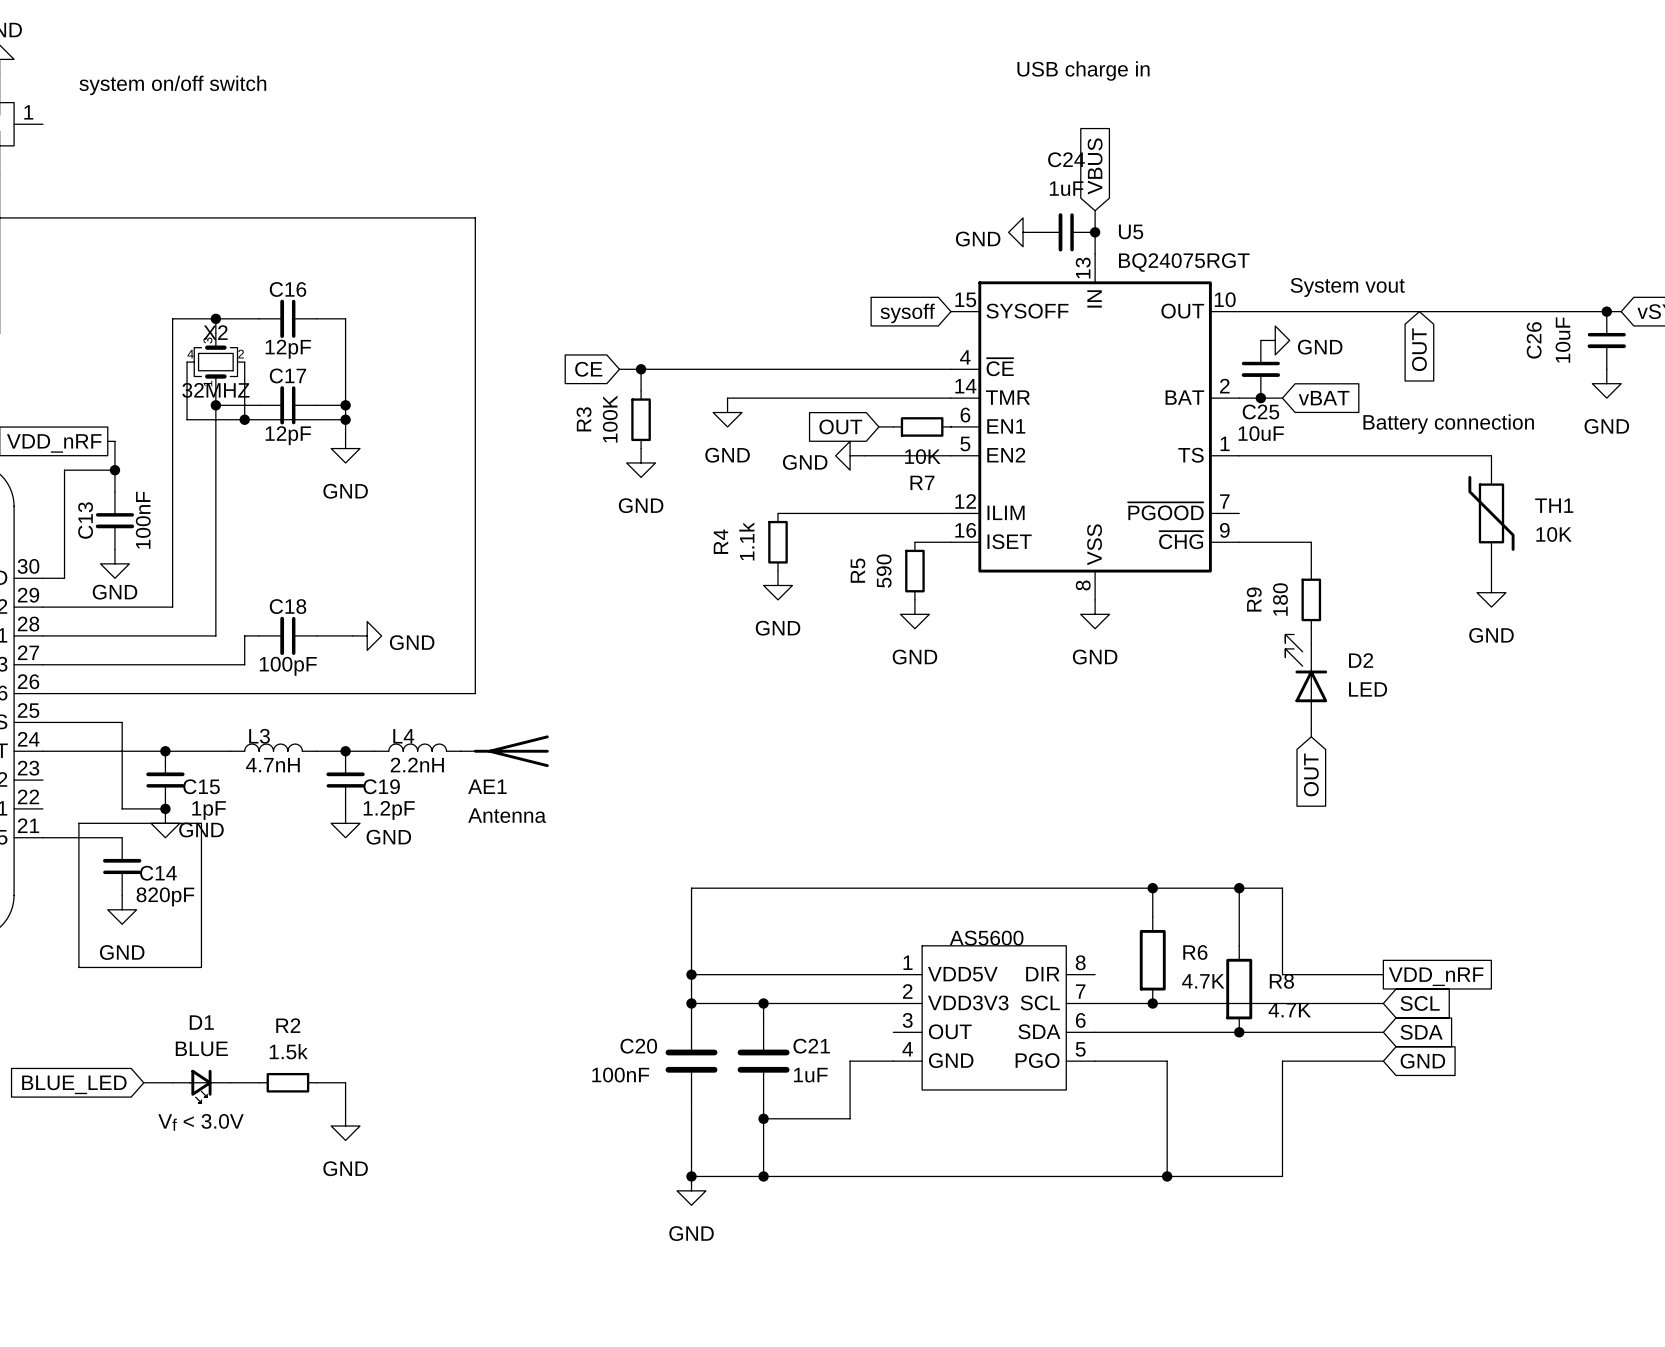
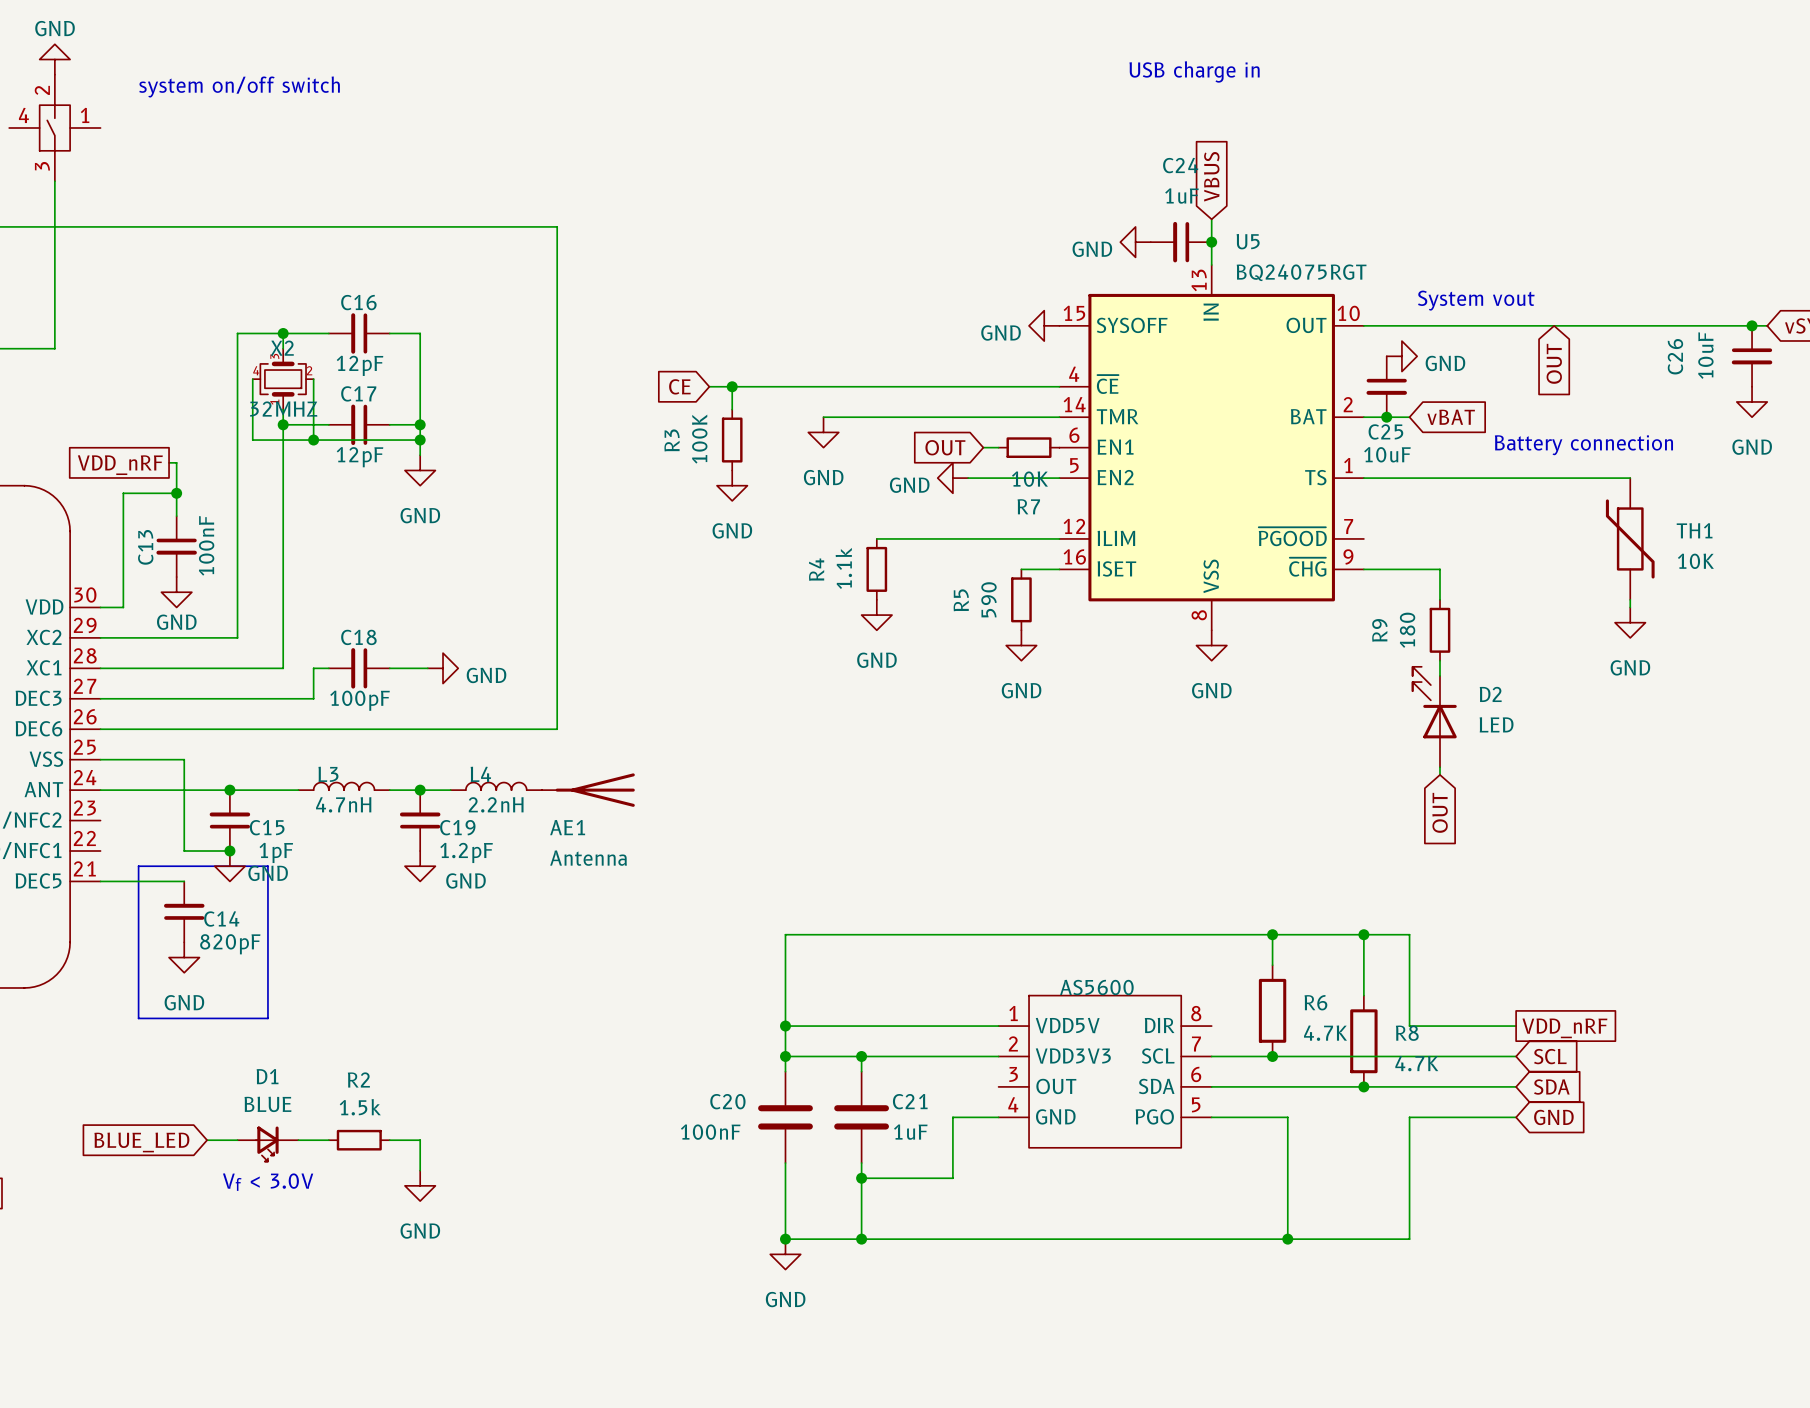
power symbol: none -> GND (1044, 325)
global label: sysoff (907, 313) -> none

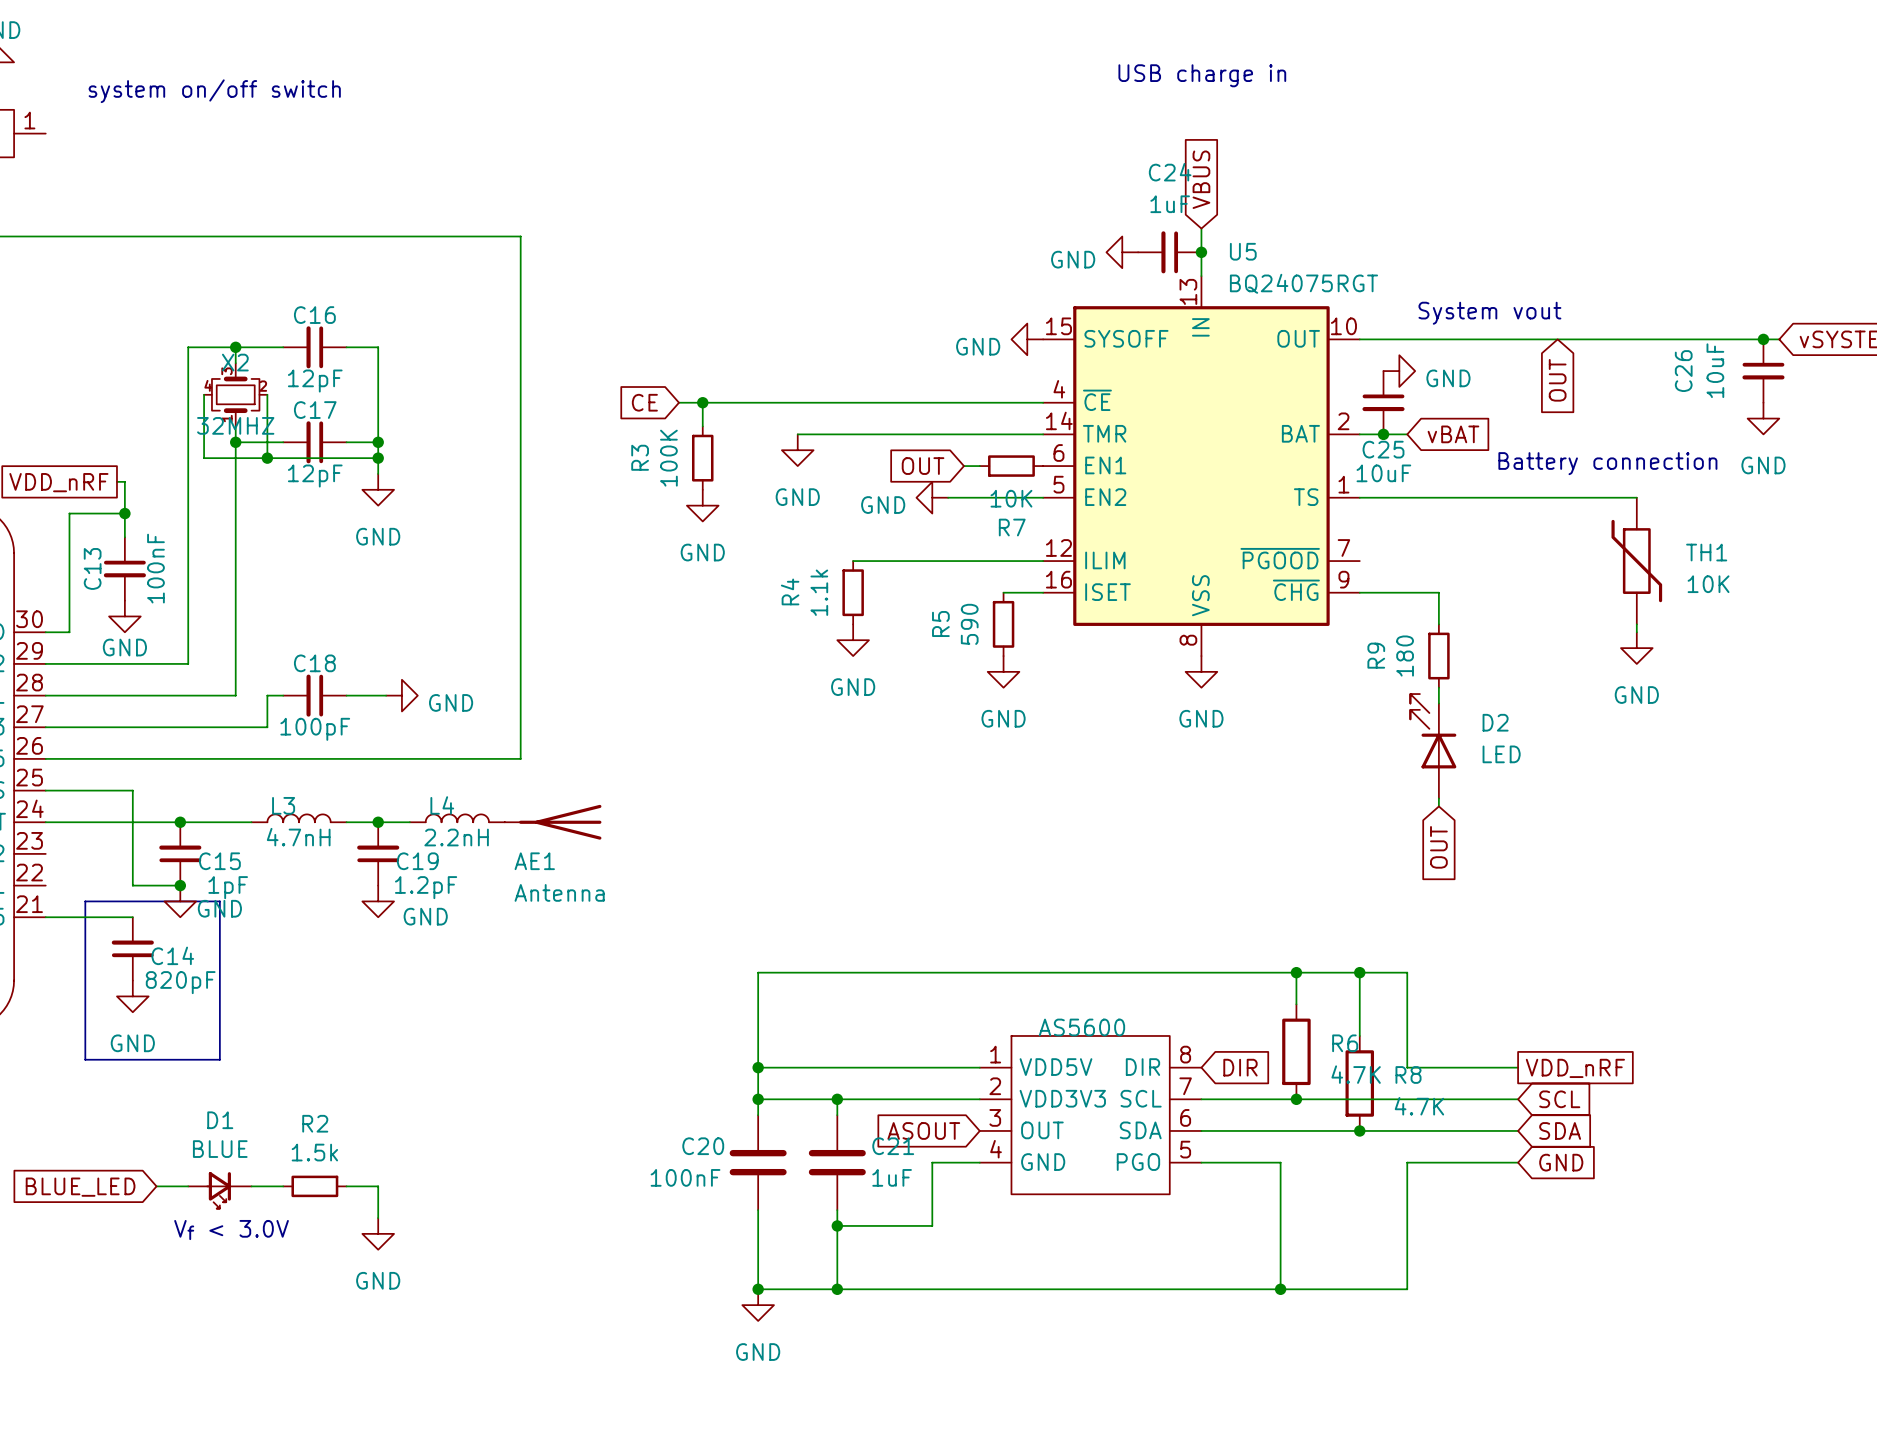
wire: (1272, 934) (1272, 965) -> (1296, 972) (1296, 1004)
junction position: (1272, 934) -> (1296, 972)
R6 position: (1272, 1010) -> (1296, 1051)
global label: none -> DIR (1240, 1067)
junction position: (1272, 1056) -> (1296, 1099)
global label: none -> ASOUT (923, 1130)

